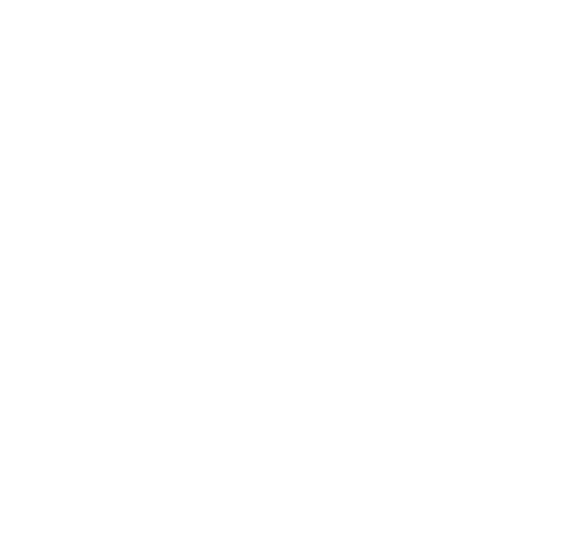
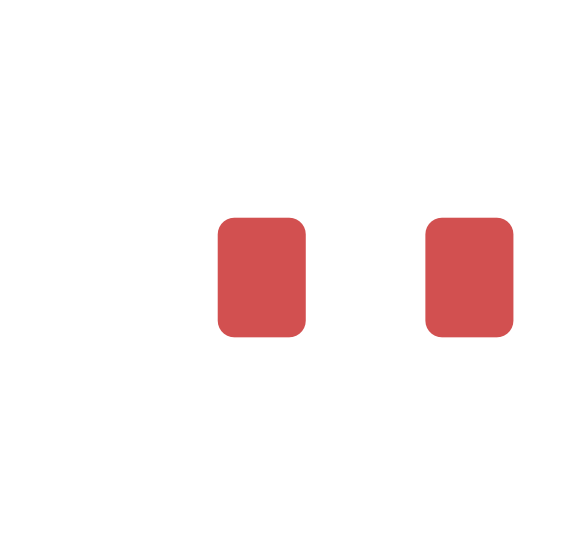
part: none -> (365, 277)

